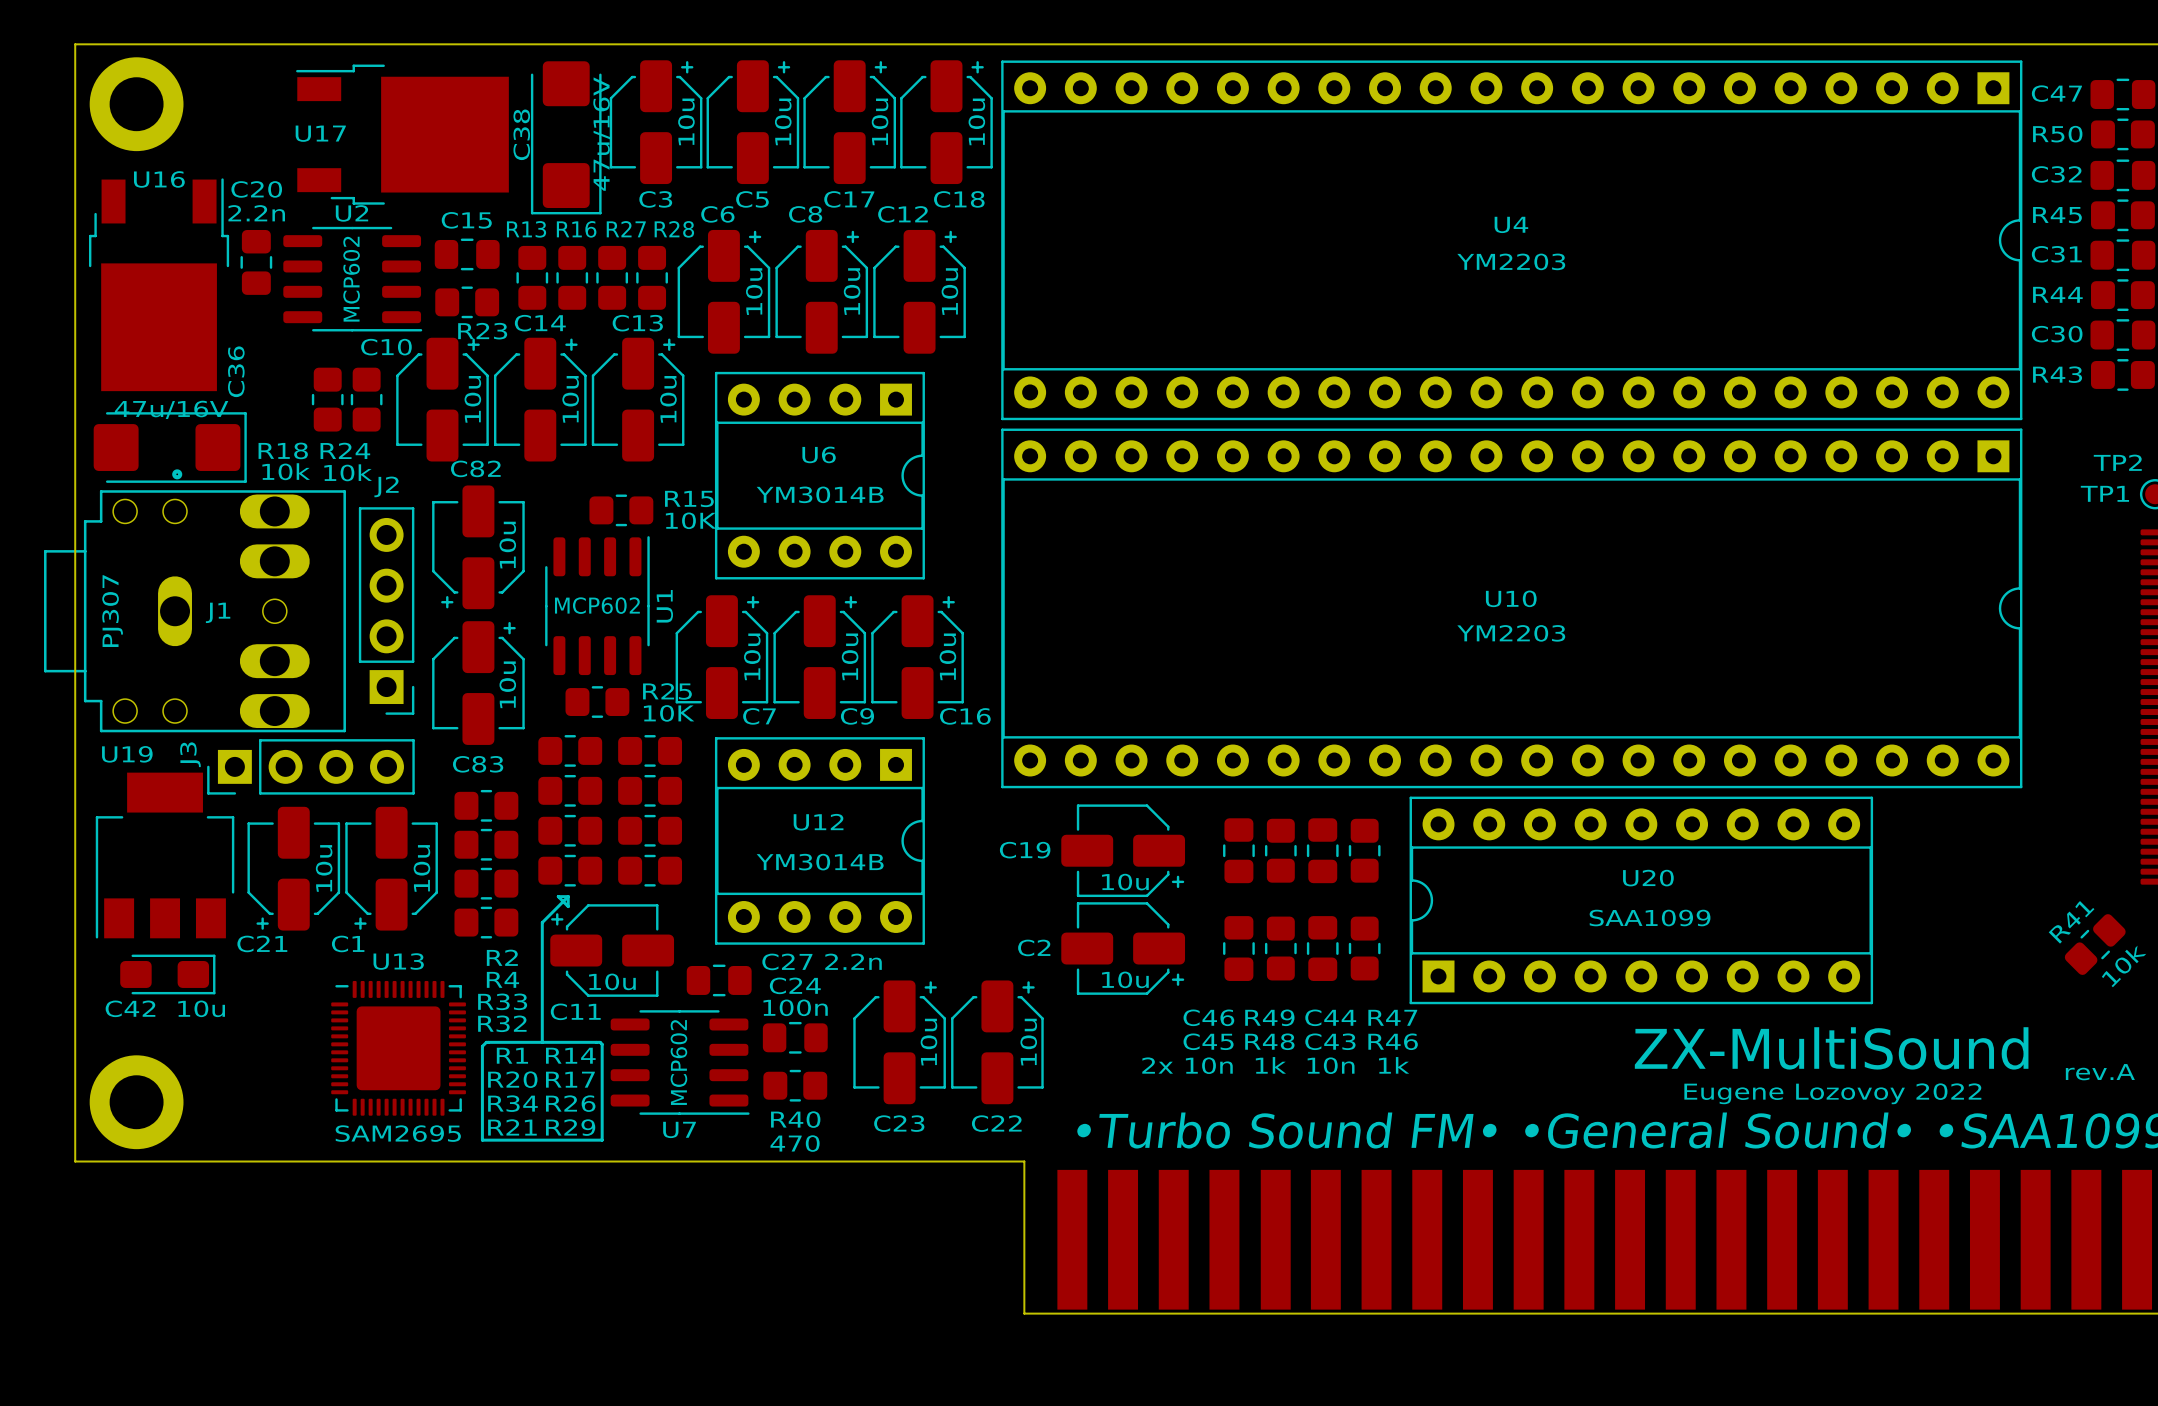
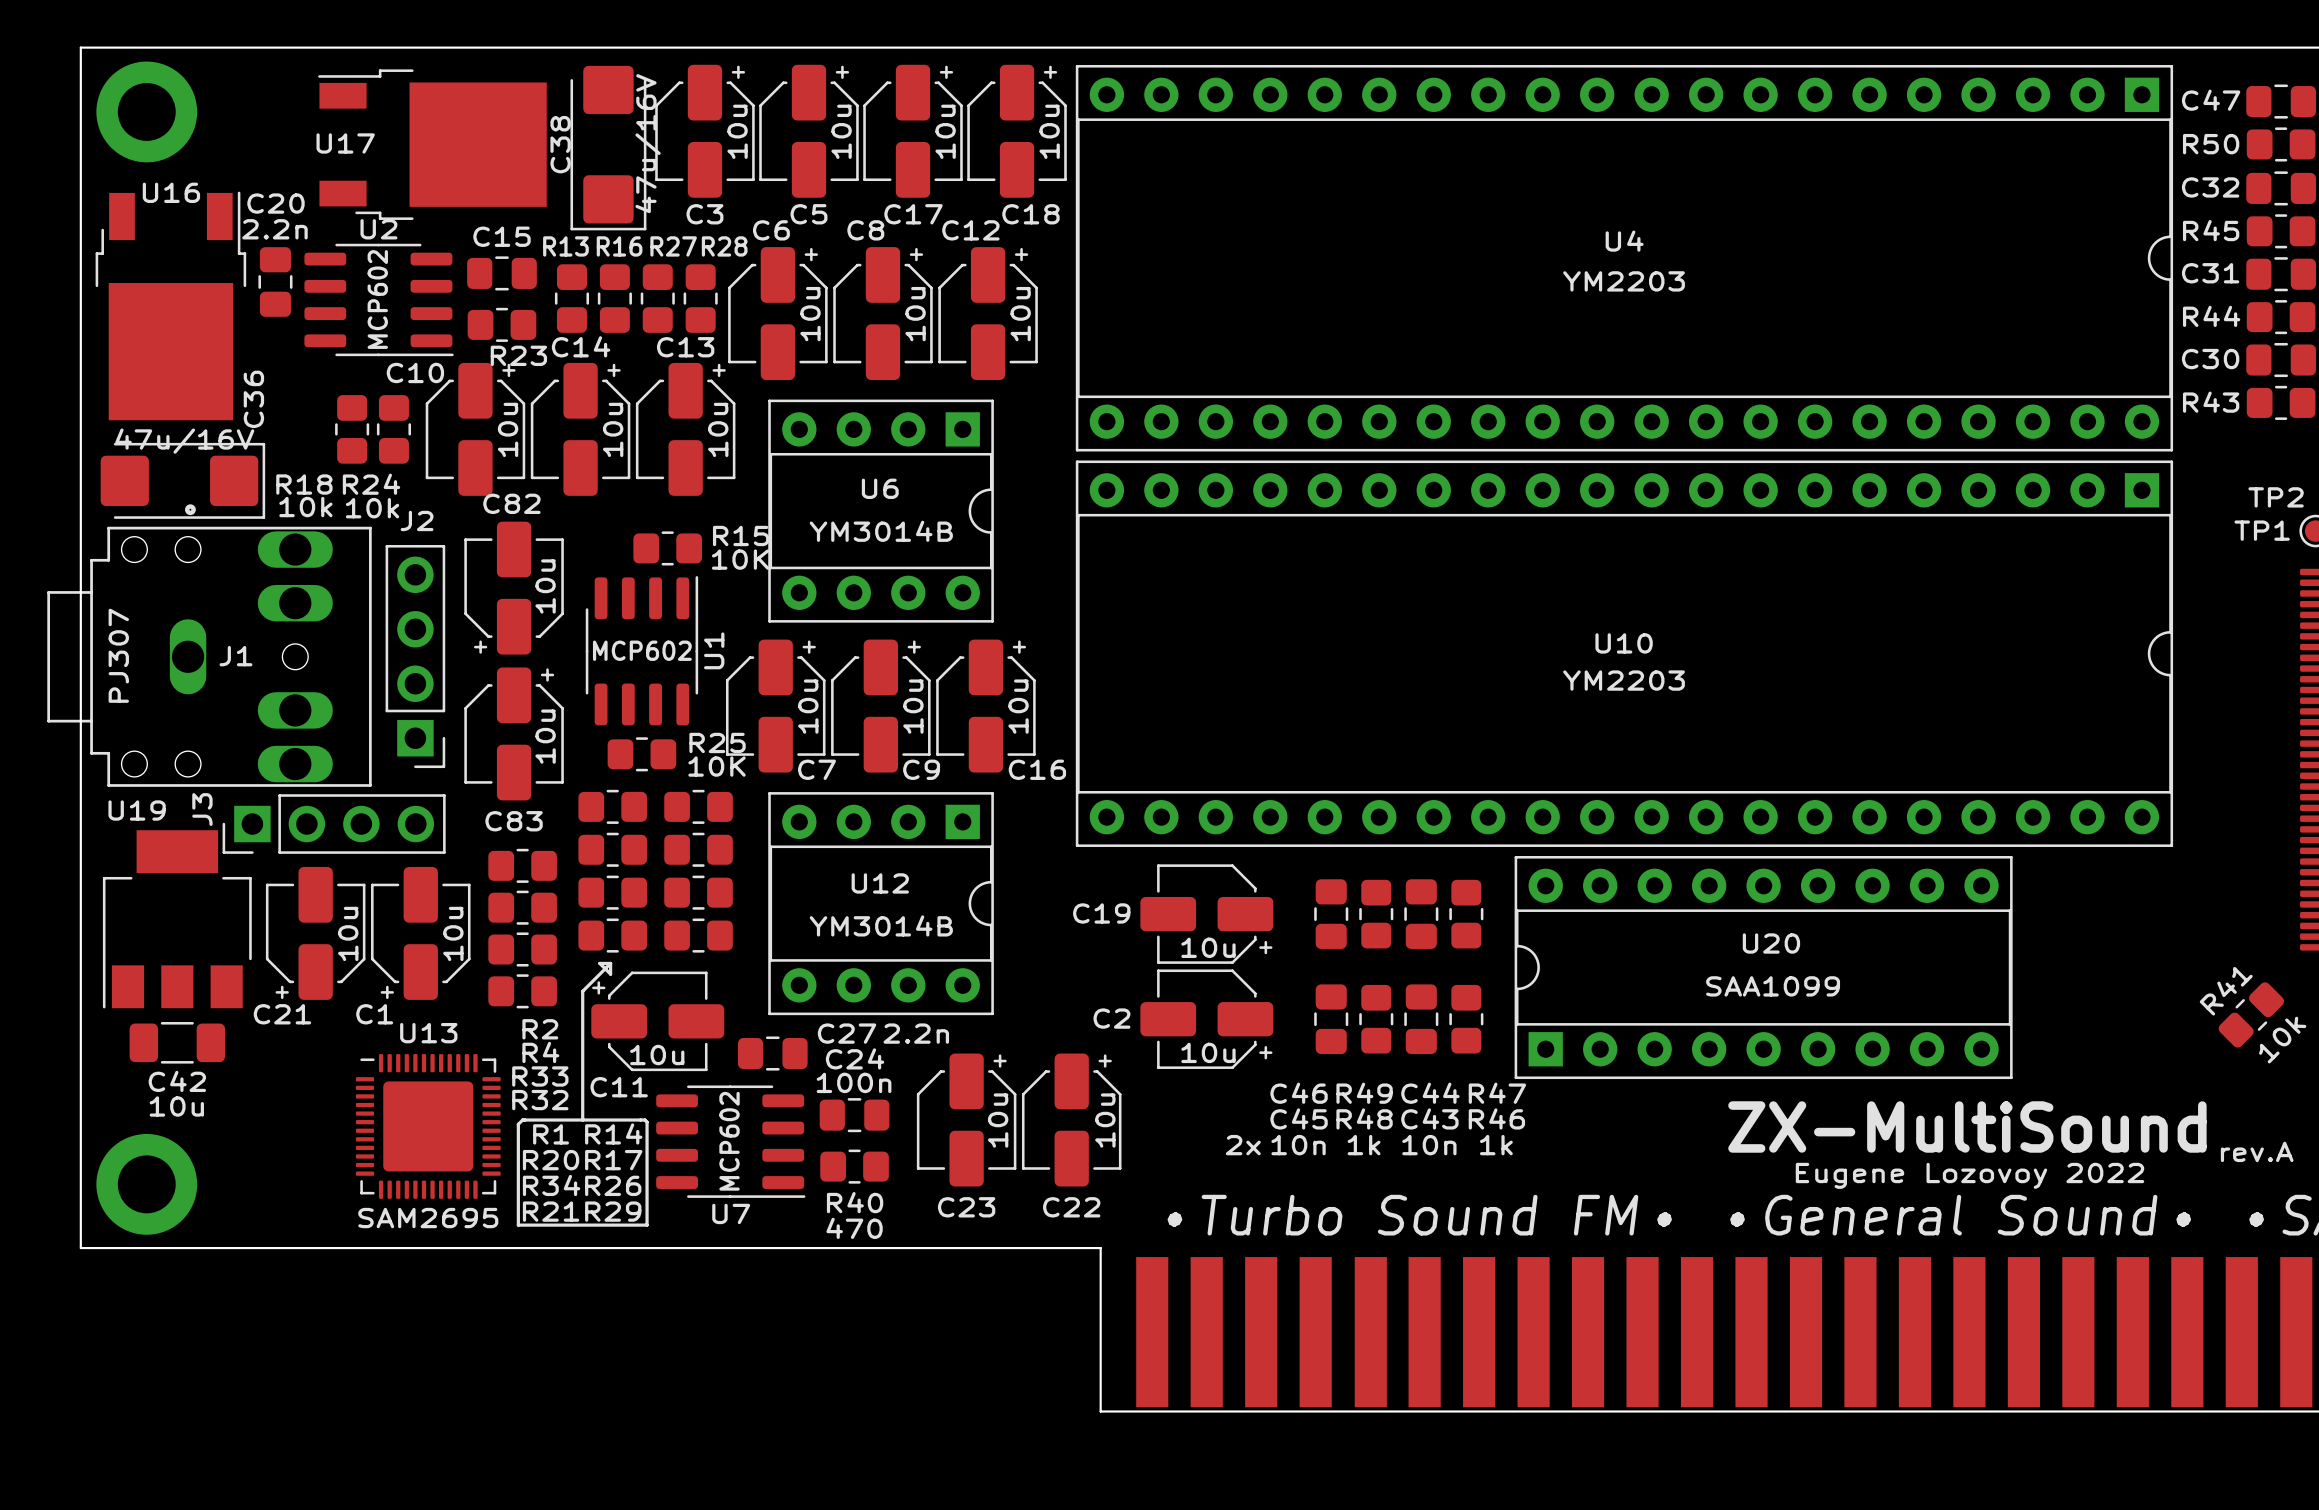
C42 footprint: [120, 954, 216, 995] -> [129, 1022, 226, 1064]
C42 value position: 10u (201, 1008) -> 10u (176, 1106)

